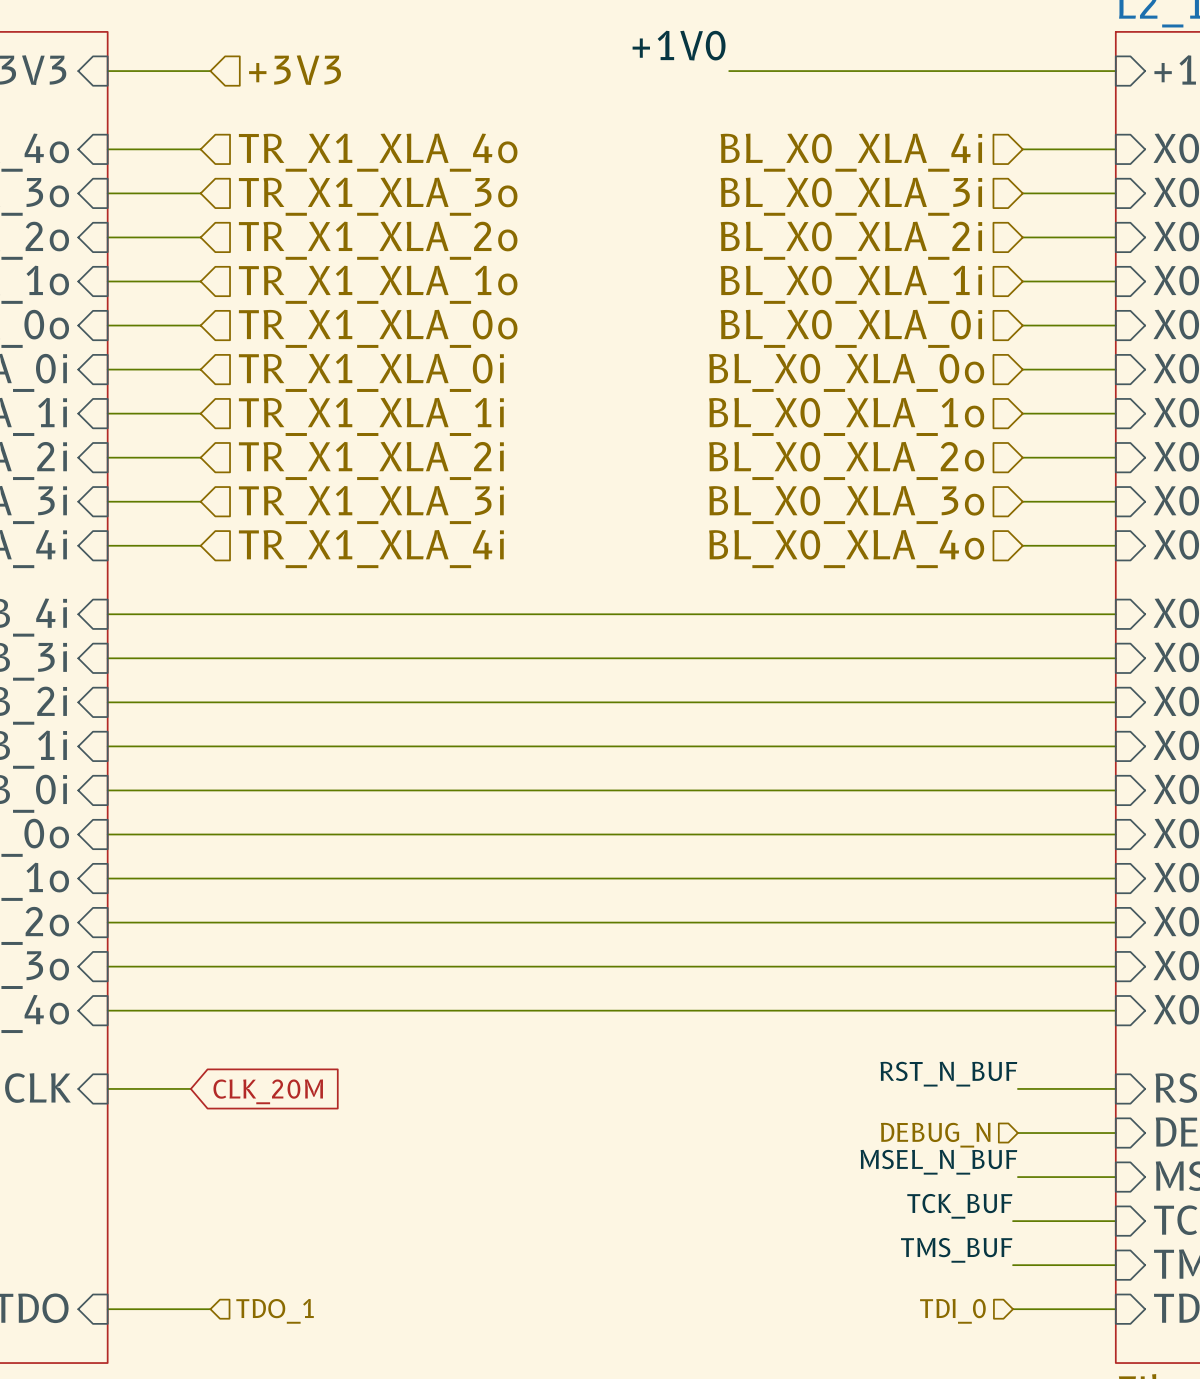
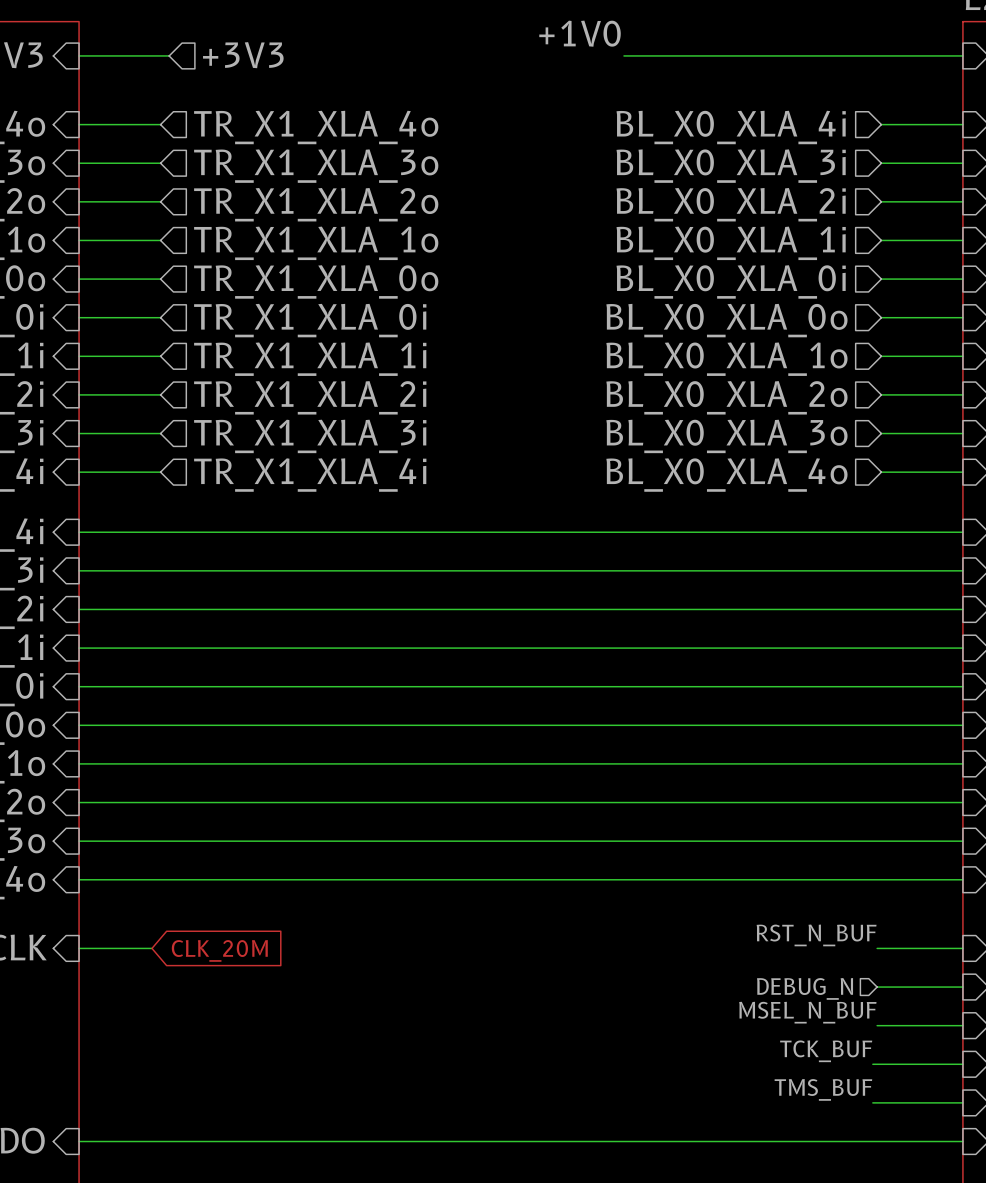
wire: none -> (169, 1141) (872, 1141)
hierarchical label: TDO_1 (275, 1311) -> none
hierarchical label: TDI_0 (952, 1311) -> none

